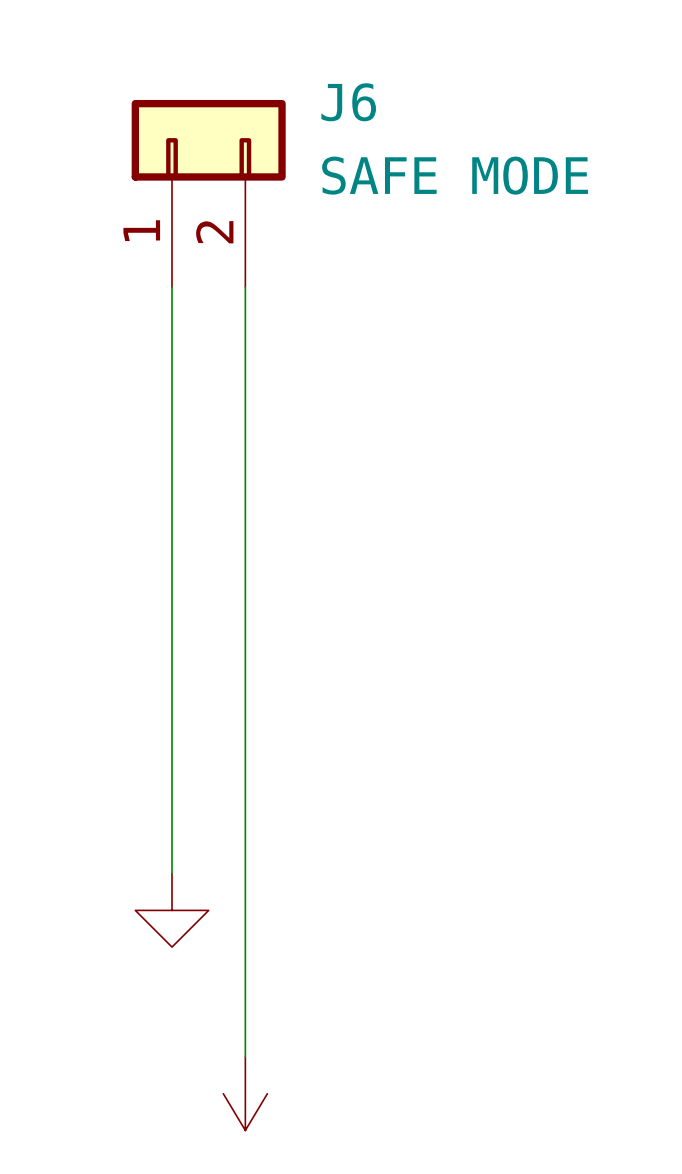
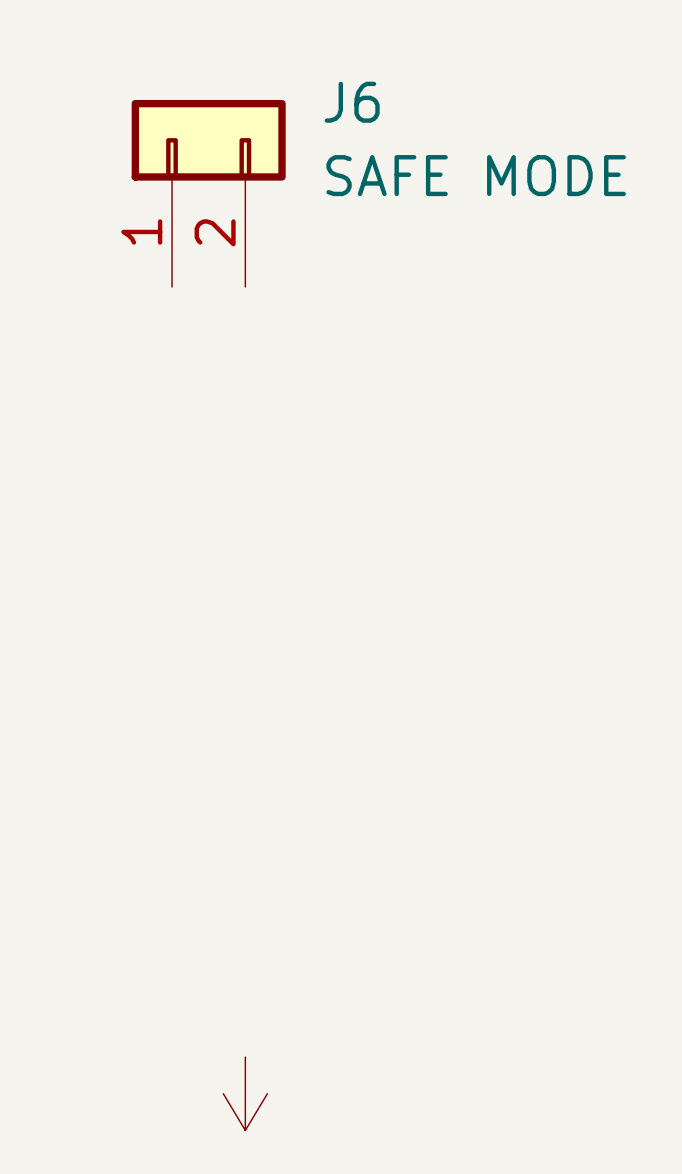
wire: (172, 286) (172, 873) -> none
wire: (245, 286) (245, 1057) -> none
power symbol: (172, 910) -> none

